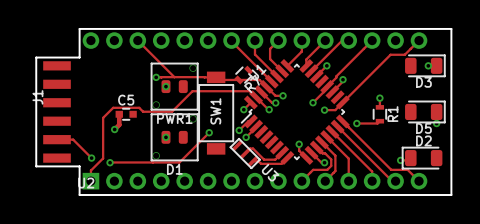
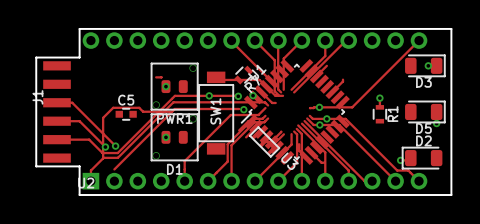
track: (137, 40) (174, 77) -> none
track: (254, 40) (254, 54) (276, 76) -> (254, 40) (274, 60) (274, 91) (278, 95)
track: (278, 40) (270, 48) (270, 59) (282, 71) -> (278, 40) (278, 89) (281, 92)
track: (301, 40) (301, 51) (287, 65) -> (301, 40) (283, 58) (283, 89)
track: (325, 40) (306, 59) (306, 65) -> (325, 40) (325, 56) (291, 89)
track: (346, 40) (342, 40) (311, 71) -> (346, 40) (294, 92)
track: (372, 40) (313, 102) -> none
track: (404, 54) (390, 54) (335, 110) (324, 110) -> (404, 54) (352, 107) (309, 108)
via: (326, 65) -> none
via: (156, 77) -> none
track: (161, 77) (216, 77) -> none
via: (343, 79) -> none
via: none -> (209, 95)
via: none -> (253, 95)
via: (283, 95) -> none
via: none -> (238, 96)
track: none -> (57, 102) (72, 102) (115, 146)
track: (250, 102) (243, 109) -> none
via: (275, 102) -> none
via: (313, 102) -> none
track: none -> (268, 105) (264, 102) (173, 102) (117, 157) (103, 158)
via: none -> (319, 107)
track: none -> (265, 108) (258, 115) (230, 115) (184, 161) (184, 181)
track: (174, 109) (192, 91) (250, 91) (269, 109) -> (174, 109) (239, 109)
via: (269, 109) -> none
via: (324, 110) -> none
track: (119, 114) (119, 124) (114, 129) -> none
track: none -> (265, 115) (262, 118) (253, 118) (227, 144) (227, 161) (208, 181)
track: none -> (268, 118) (264, 122) (254, 122) (231, 145) (231, 181)
via: none -> (326, 118)
track: none -> (57, 121) (79, 121) (105, 147)
track: (342, 121) (391, 169) (408, 170) -> (309, 115) (312, 118) (345, 118) (397, 170) (408, 170)
track: (379, 121) (377, 123) (356, 123) -> none
via: (356, 123) -> none
via: none -> (319, 125)
track: (337, 126) (392, 181) (395, 181) -> (307, 118) (313, 125) (339, 125) (395, 181)
via: (114, 129) -> none
via: (239, 130) -> none
track: none -> (281, 131) (271, 141) (264, 141)
track: none -> (294, 131) (297, 134) (297, 162) (278, 181)
track: (332, 131) (372, 171) (372, 181) -> (304, 121) (364, 181) (372, 181)
track: (209, 132) (179, 162) (110, 162) -> none
via: (209, 132) -> none
track: none -> (283, 134) (272, 145) (272, 149)
track: none -> (291, 134) (291, 144) (254, 181)
via: (246, 137) -> none
track: (327, 137) (348, 158) (348, 170) -> (301, 123) (348, 170)
track: (73, 139) (91, 158) -> (73, 139) (89, 139) (102, 153) (117, 153) (174, 95) (238, 96)
track: (321, 142) (335, 155) (335, 171) (325, 181) -> (298, 125) (325, 152) (325, 181)
via: (299, 144) -> none
via: none -> (115, 146)
via: none -> (105, 147)
track: (316, 147) (331, 159) (331, 165) (327, 169) (313, 169) (301, 181) -> (296, 128) (301, 134) (301, 181)
track: (282, 152) (275, 159) (264, 159) (253, 148) (250, 148) (245, 153) -> none
U3 position: (245, 153) -> (264, 141)
track: (287, 157) (281, 163) (261, 163) (258, 161) (253, 161) -> none
via: (91, 158) -> none
via: (110, 162) -> none
via: (324, 162) -> none

